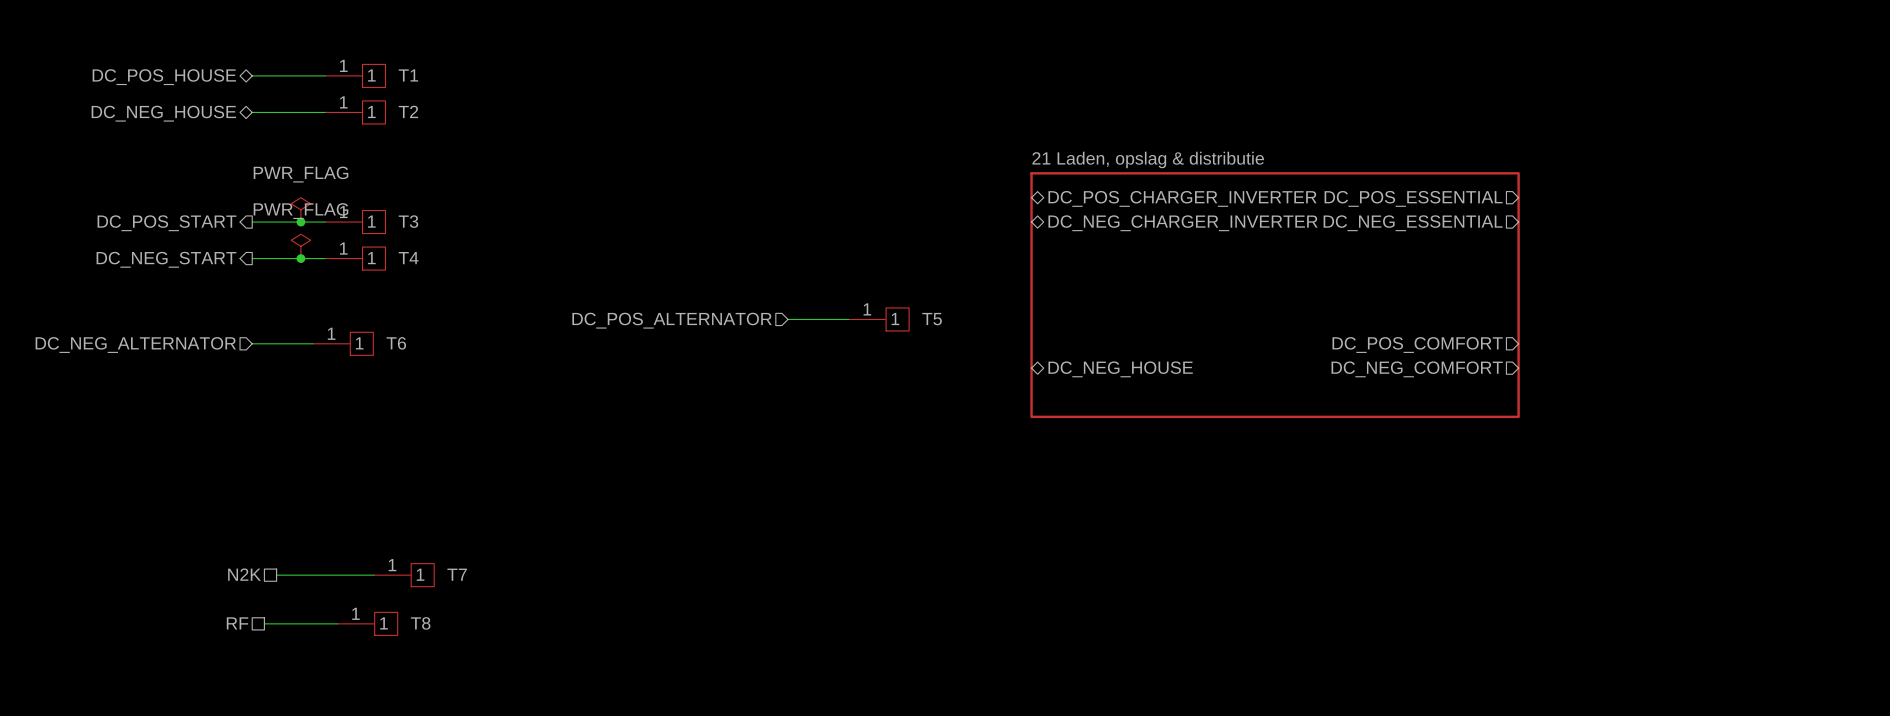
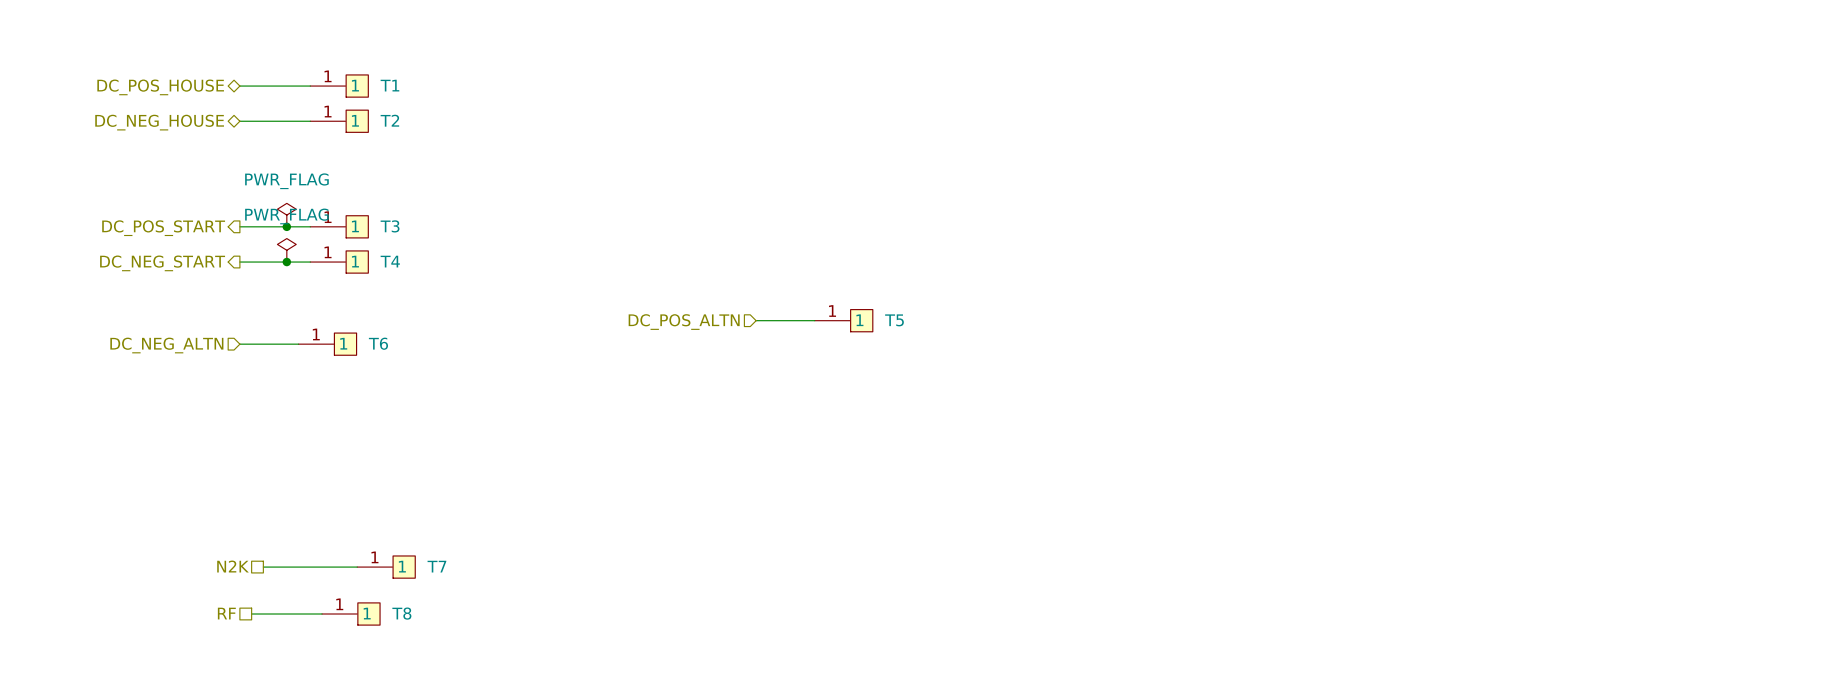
sheet pin: DC_POS_CHARGER_INVERTER (1182, 198) -> none
sheet pin: DC_POS_ESSENTIAL (1413, 198) -> none
sheet pin: DC_NEG_CHARGER_INVERTER (1183, 223) -> none
sheet pin: DC_NEG_ESSENTIAL (1413, 223) -> none
sheet 21 Laden, opslag & distributie: (1275, 295) -> none
hierarchical label: DC_POS_ALTERNATOR (672, 320) -> DC_POS_ALTN (684, 322)
hierarchical label: DC_NEG_ALTERNATOR (135, 345) -> DC_NEG_ALTN (166, 345)
sheet pin: DC_POS_COMFORT (1417, 345) -> none
sheet pin: DC_NEG_HOUSE (1120, 369) -> none
sheet pin: DC_NEG_COMFORT (1417, 369) -> none

